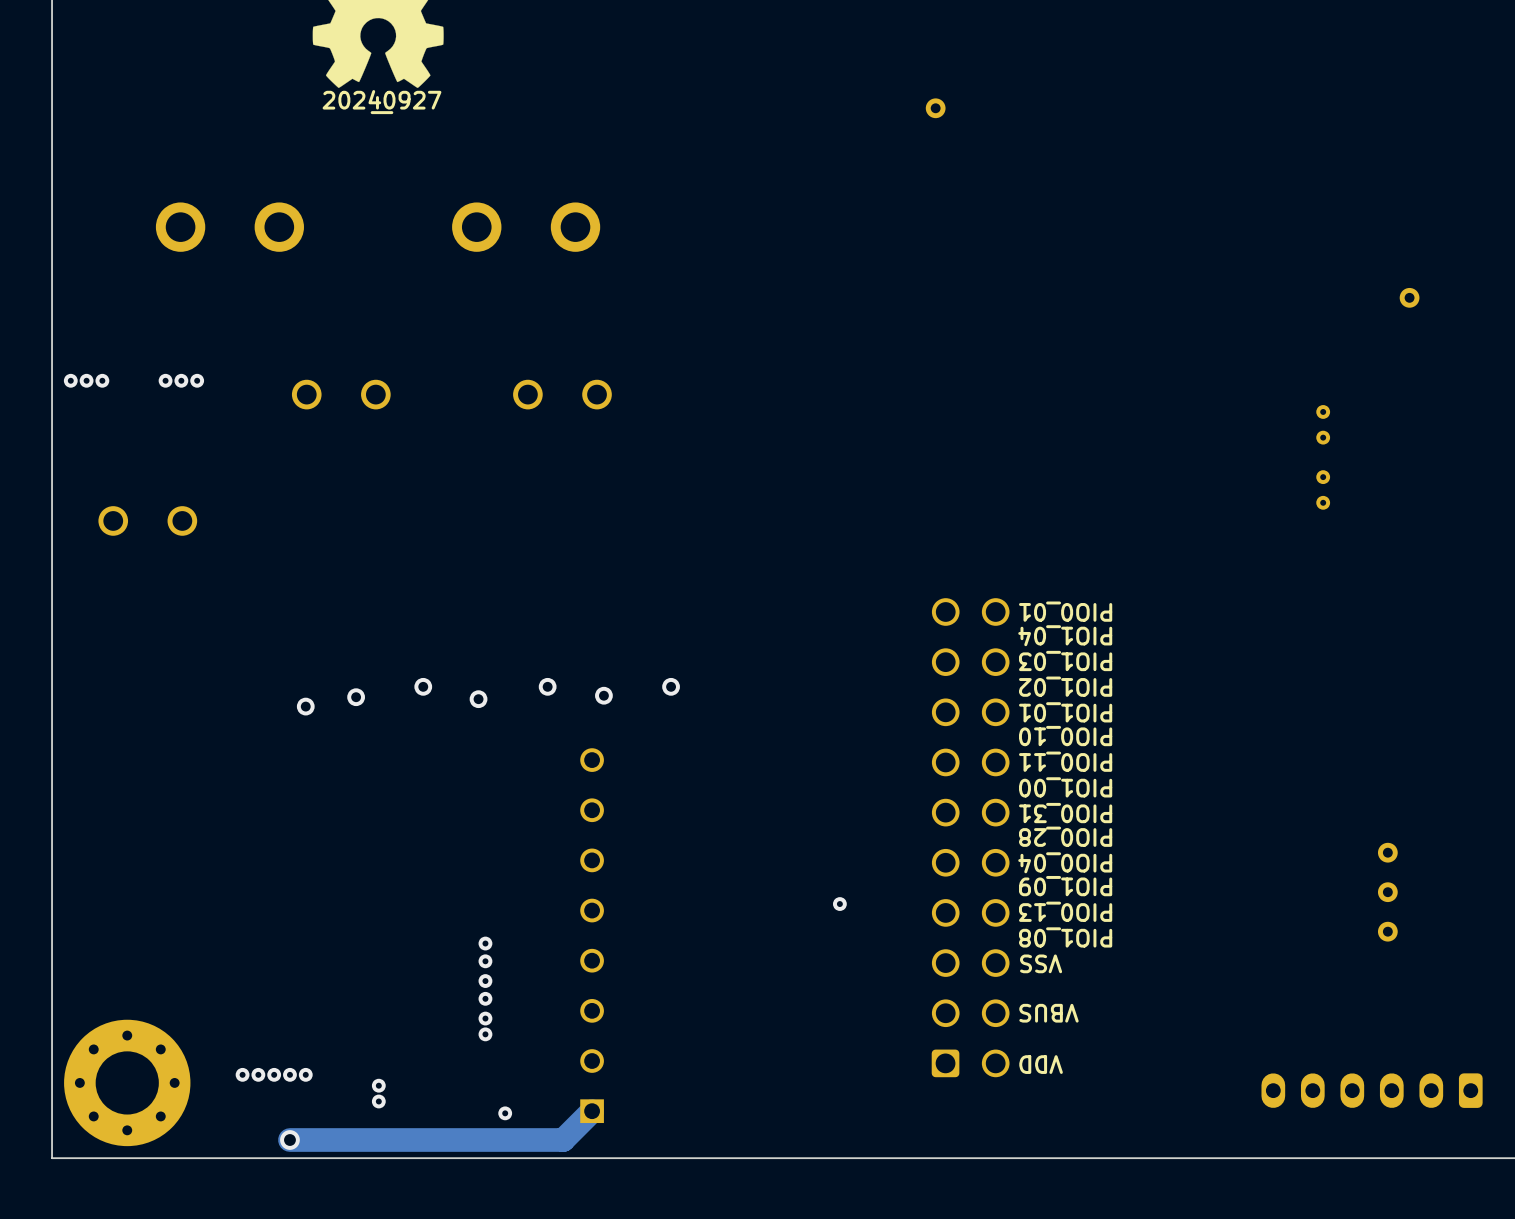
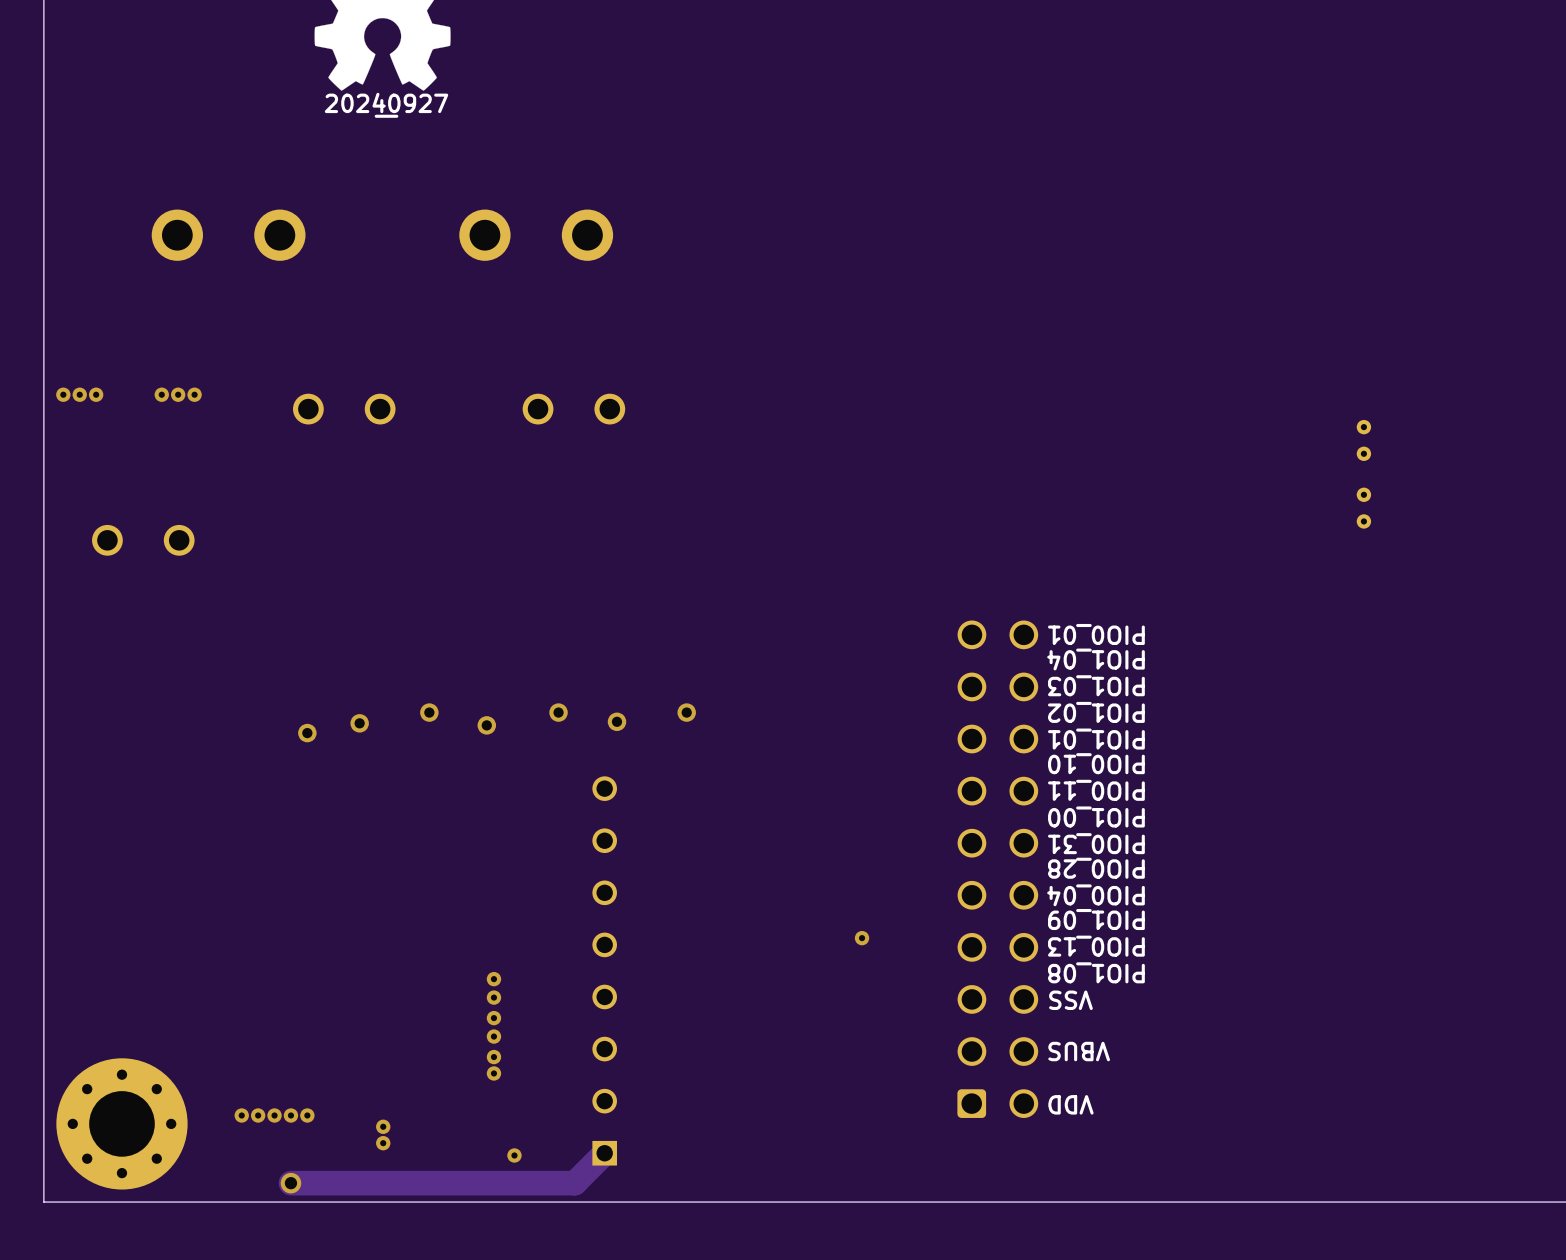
part: (935, 108) -> none
part: (1409, 297) -> none
part: (1387, 852) -> none
part: (1387, 892) -> none
part: (1387, 931) -> none
part: (1372, 1090) -> none

